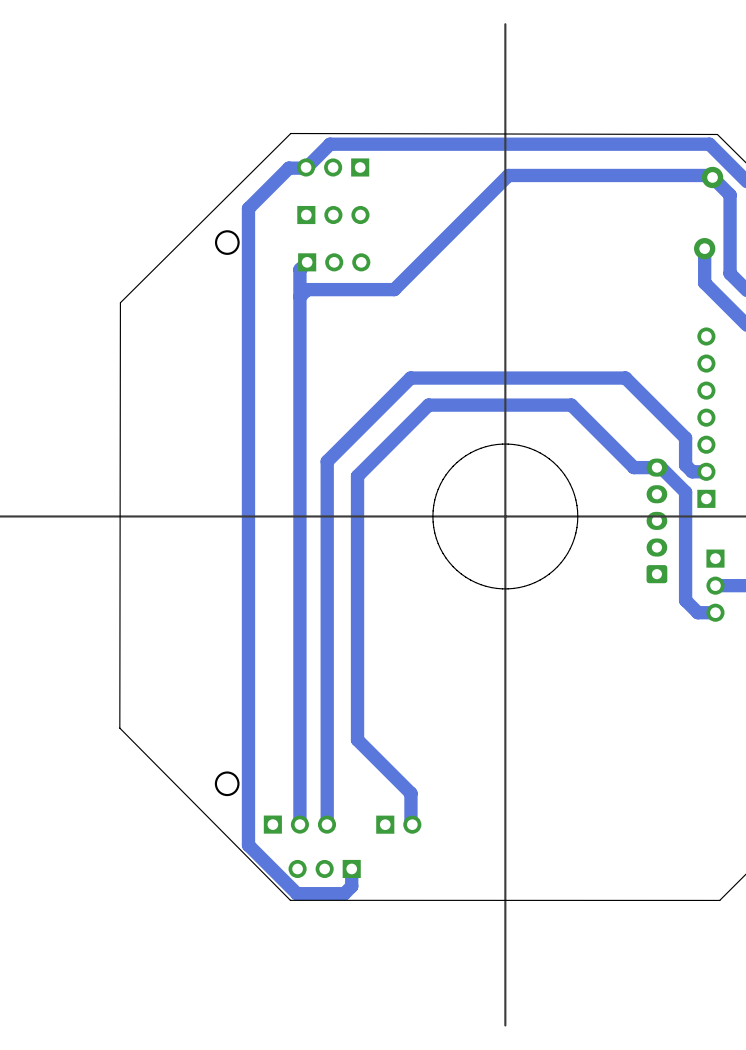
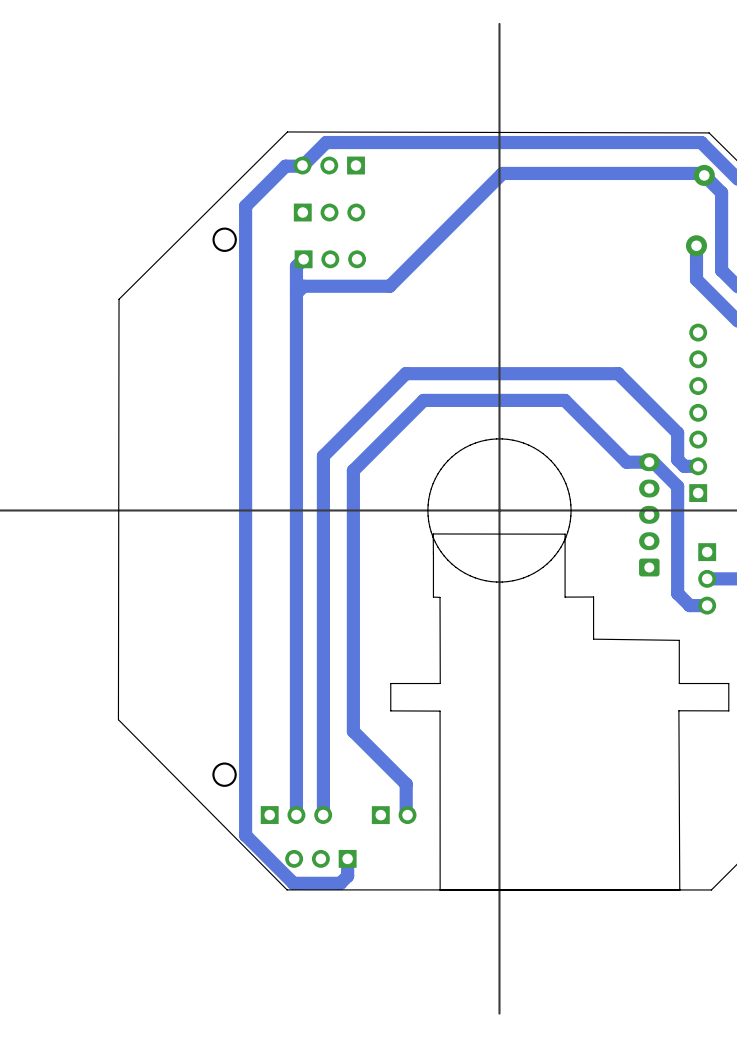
board edge: none -> (433, 533) (433, 597) (440, 597) (440, 683) (390, 683) (390, 710) (440, 711) (440, 890) (679, 890) (678, 710) (728, 710) (728, 683) (679, 683) (679, 640) (593, 639) (593, 597) (565, 597) (565, 534) (433, 533)

